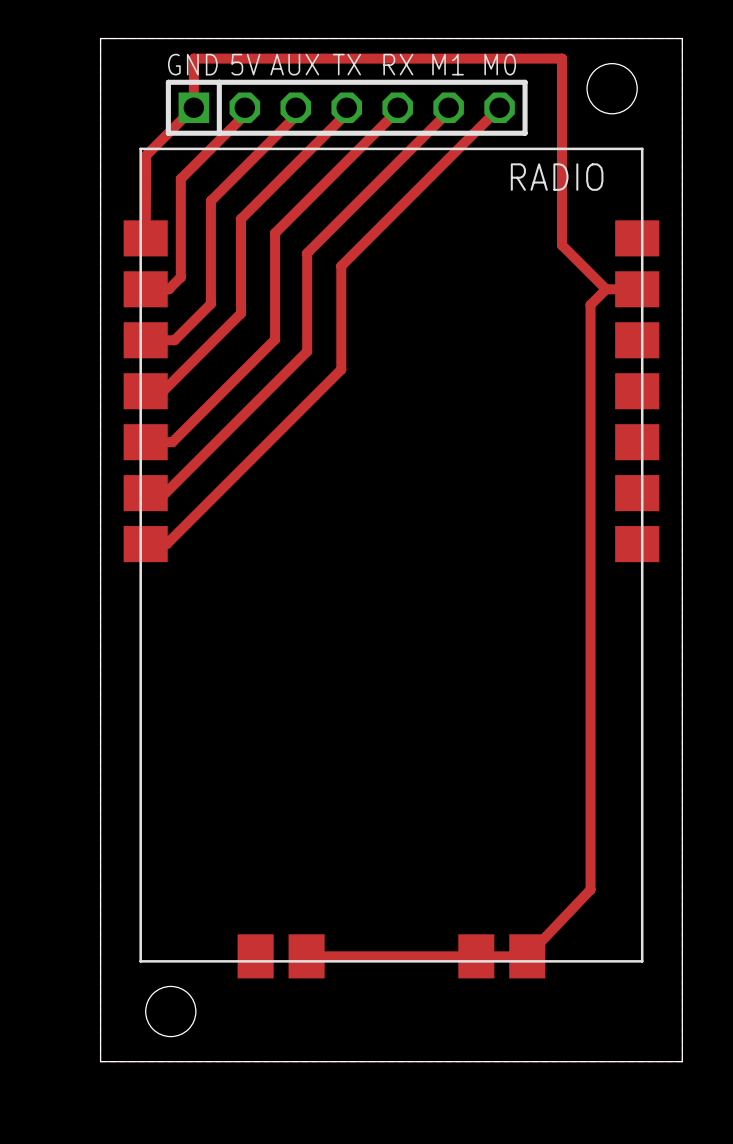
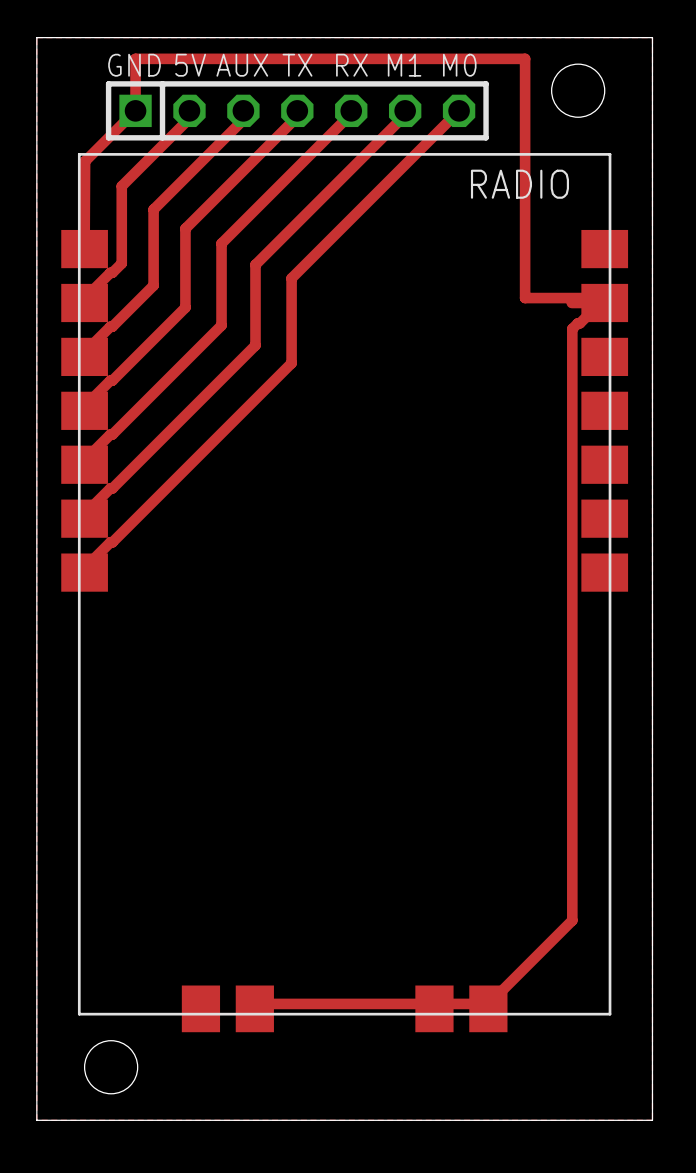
top track: (561, 245) (606, 289) (590, 304) (590, 889) (527, 956) (306, 956) -> (525, 256) (525, 298) (605, 298) (572, 328) (572, 920) (488, 1003) (255, 1003)
top track: (180, 251) (180, 277) (168, 289) (145, 289) -> (121, 263) (85, 298)
top track: (210, 272) (210, 303) (174, 340) (145, 340) -> (153, 285) (85, 351)
top track: (241, 293) (241, 313) (163, 391) (145, 391) -> (185, 307) (85, 405)
top track: (275, 310) (275, 339) (172, 442) (145, 442) -> (221, 325) (85, 459)
top track: (307, 329) (307, 351) (165, 493) (145, 493) -> (255, 345) (85, 513)
top track: (341, 346) (341, 369) (166, 544) (145, 544) -> (291, 363) (85, 567)

